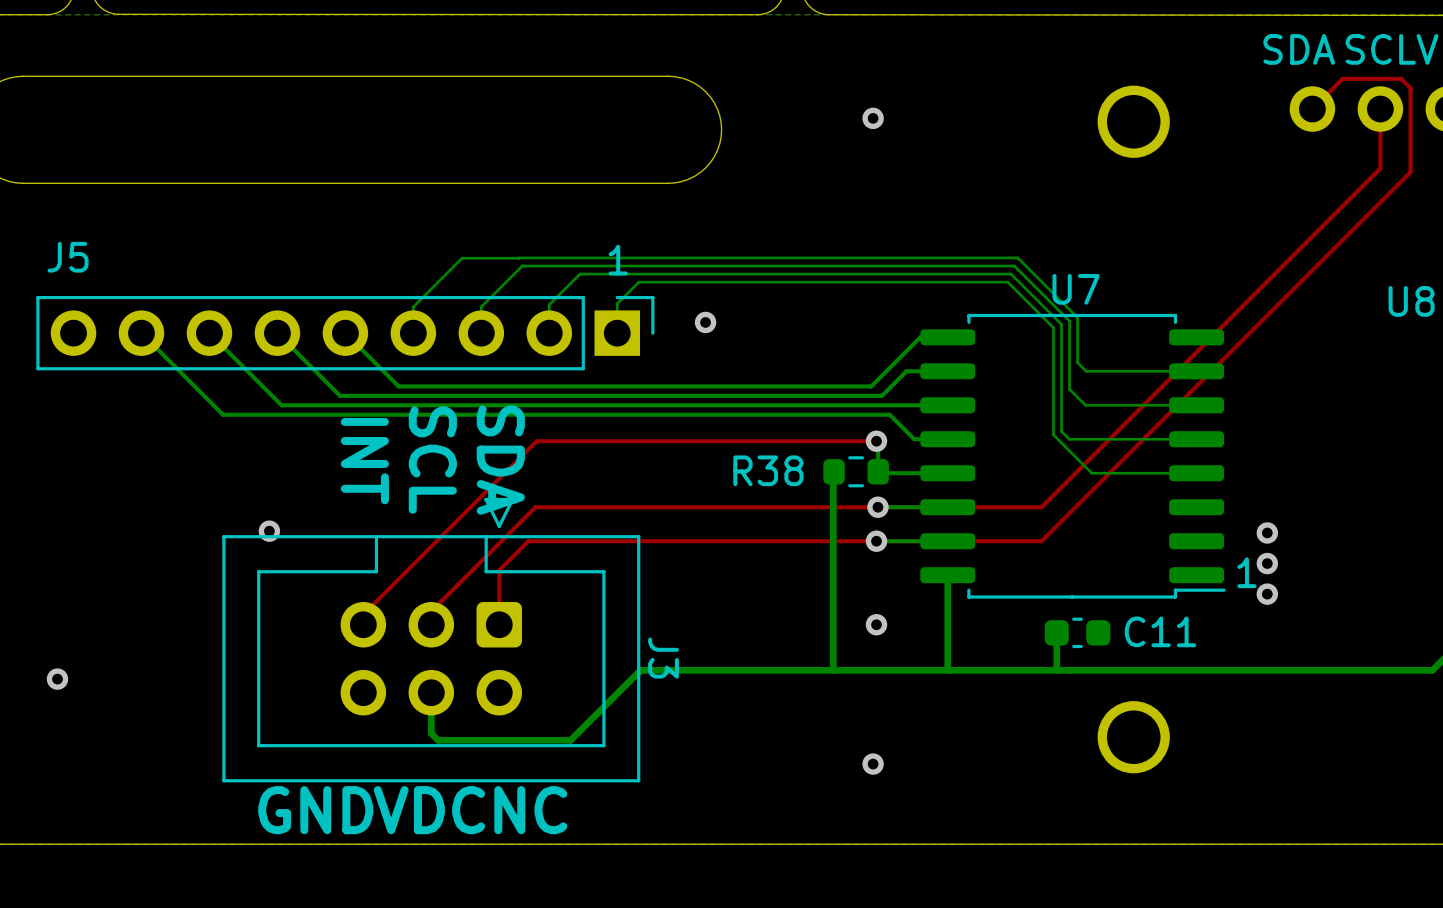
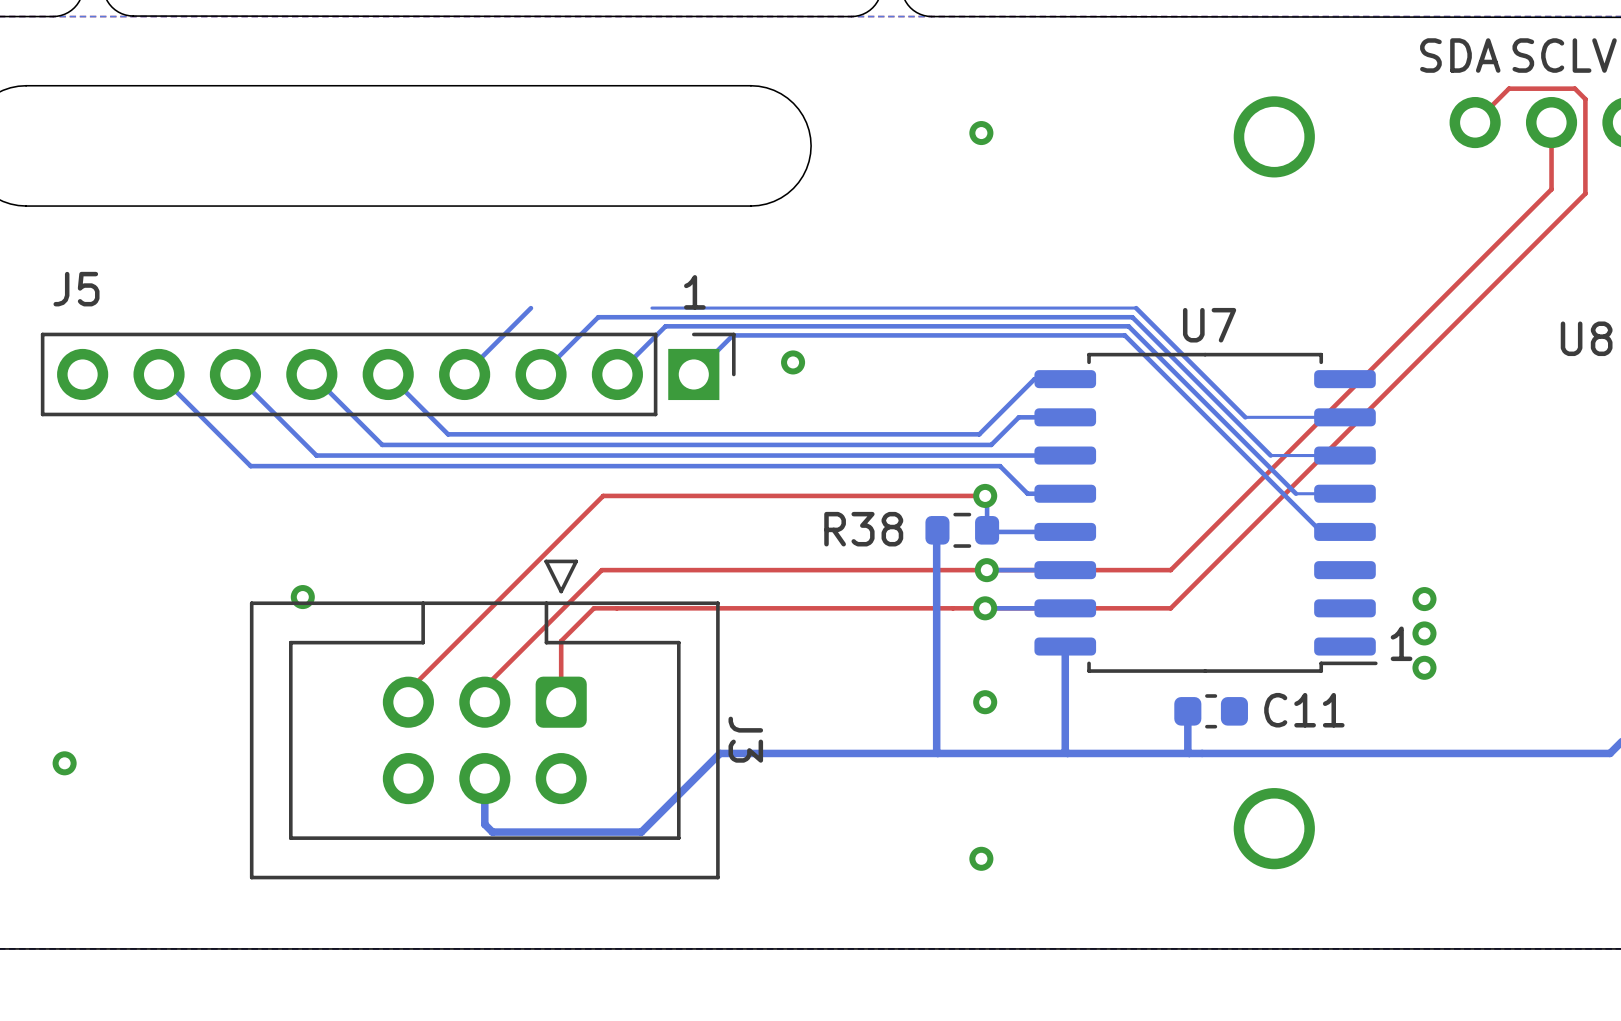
bottom track: (518, 257) (1017, 257) (1077, 317) (1077, 362) (1086, 371) (1107, 371) -> none
bottom track: (518, 258) (462, 258) (413, 306) (413, 333) -> (530, 308) (464, 374)
bottom track: (580, 274) (549, 304) (549, 333) -> (1296, 493) (1128, 326) (665, 326) (617, 374)
bottom track: (1011, 274) (1061, 324) (1061, 431) (1069, 439) (1153, 439) -> (1136, 308) (1245, 417)
bottom track: (481, 333) (481, 306) (522, 266) (1014, 266) (1069, 321) (1069, 389) (1085, 405) (1130, 405) -> (541, 374) (598, 317) (1132, 317) (1270, 455)
bottom track: (617, 333) (617, 303) (638, 282) (1007, 282) (1053, 327) (1053, 434) (1091, 473) (1175, 473) -> (693, 374) (732, 335) (1124, 335) (1321, 531)
text: SCL (432, 460) -> none
text: SDA (500, 460) -> none
text: INT (364, 461) -> none
text: GND (315, 810) -> none
text: VDC (429, 810) -> none
text: NC (530, 810) -> none

